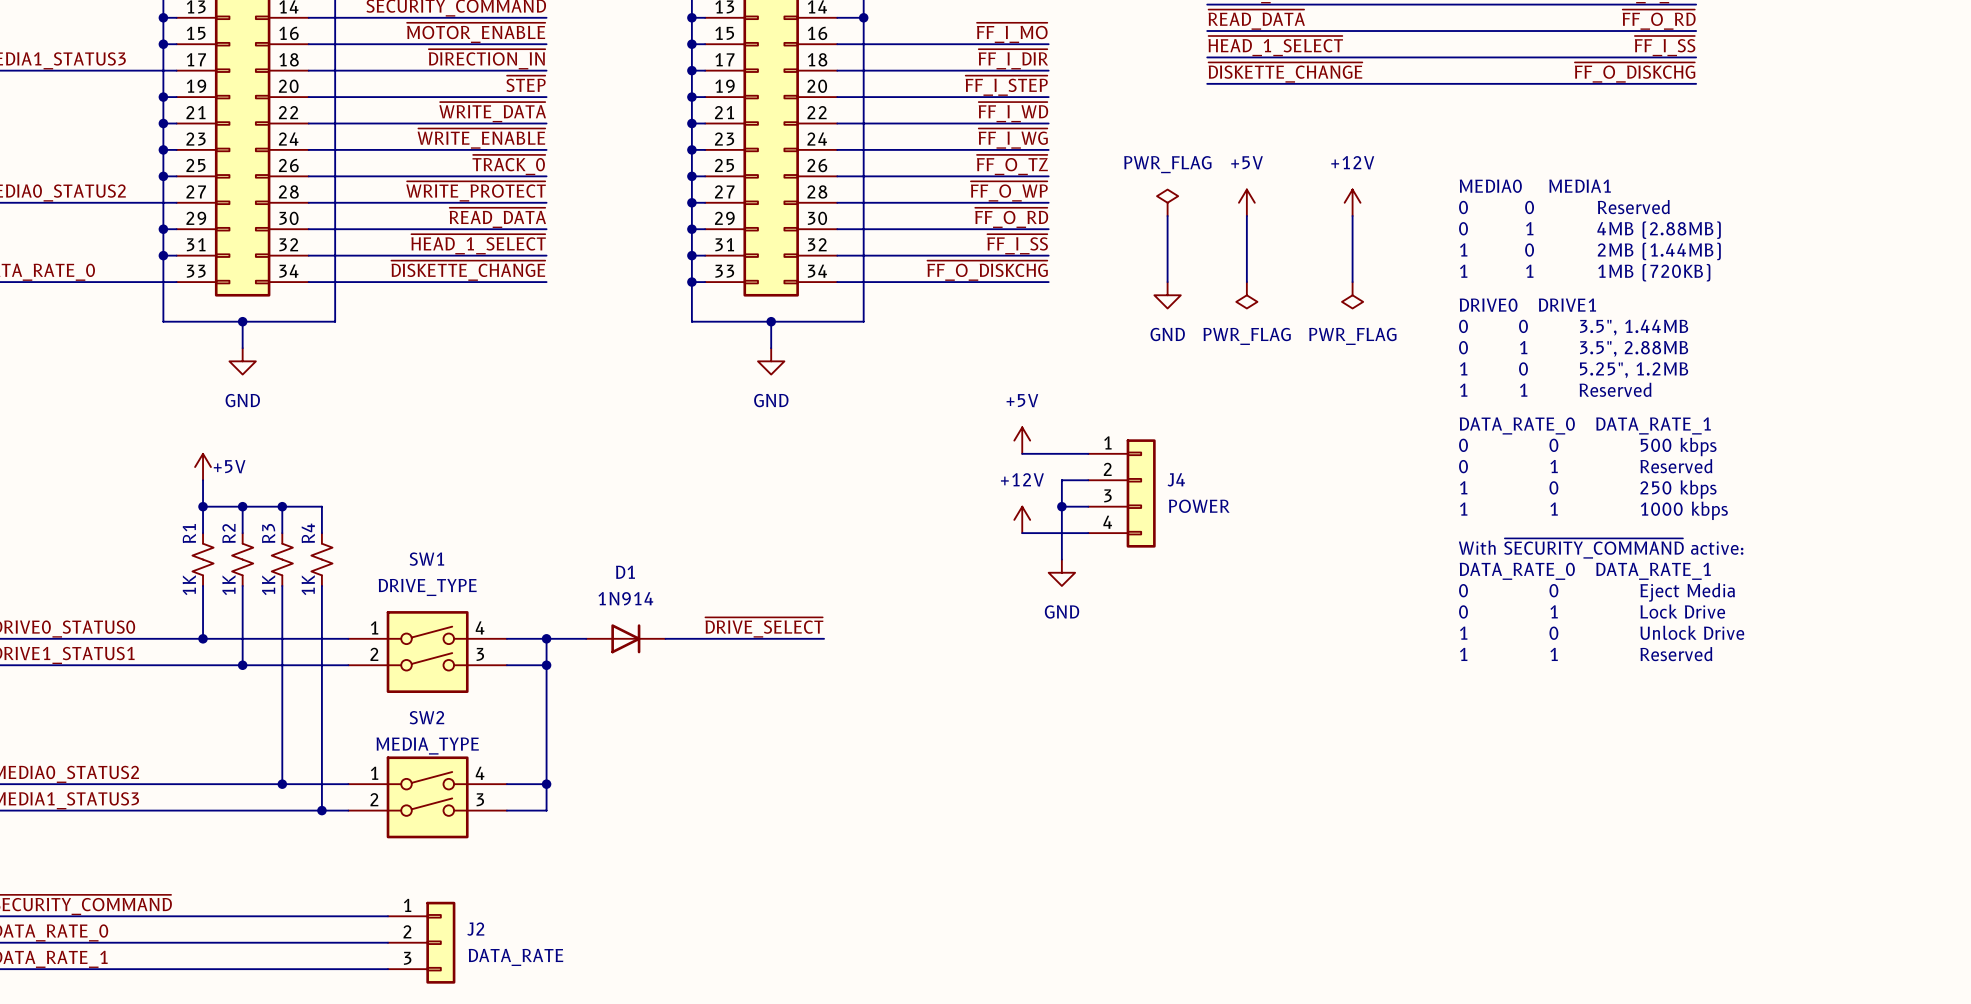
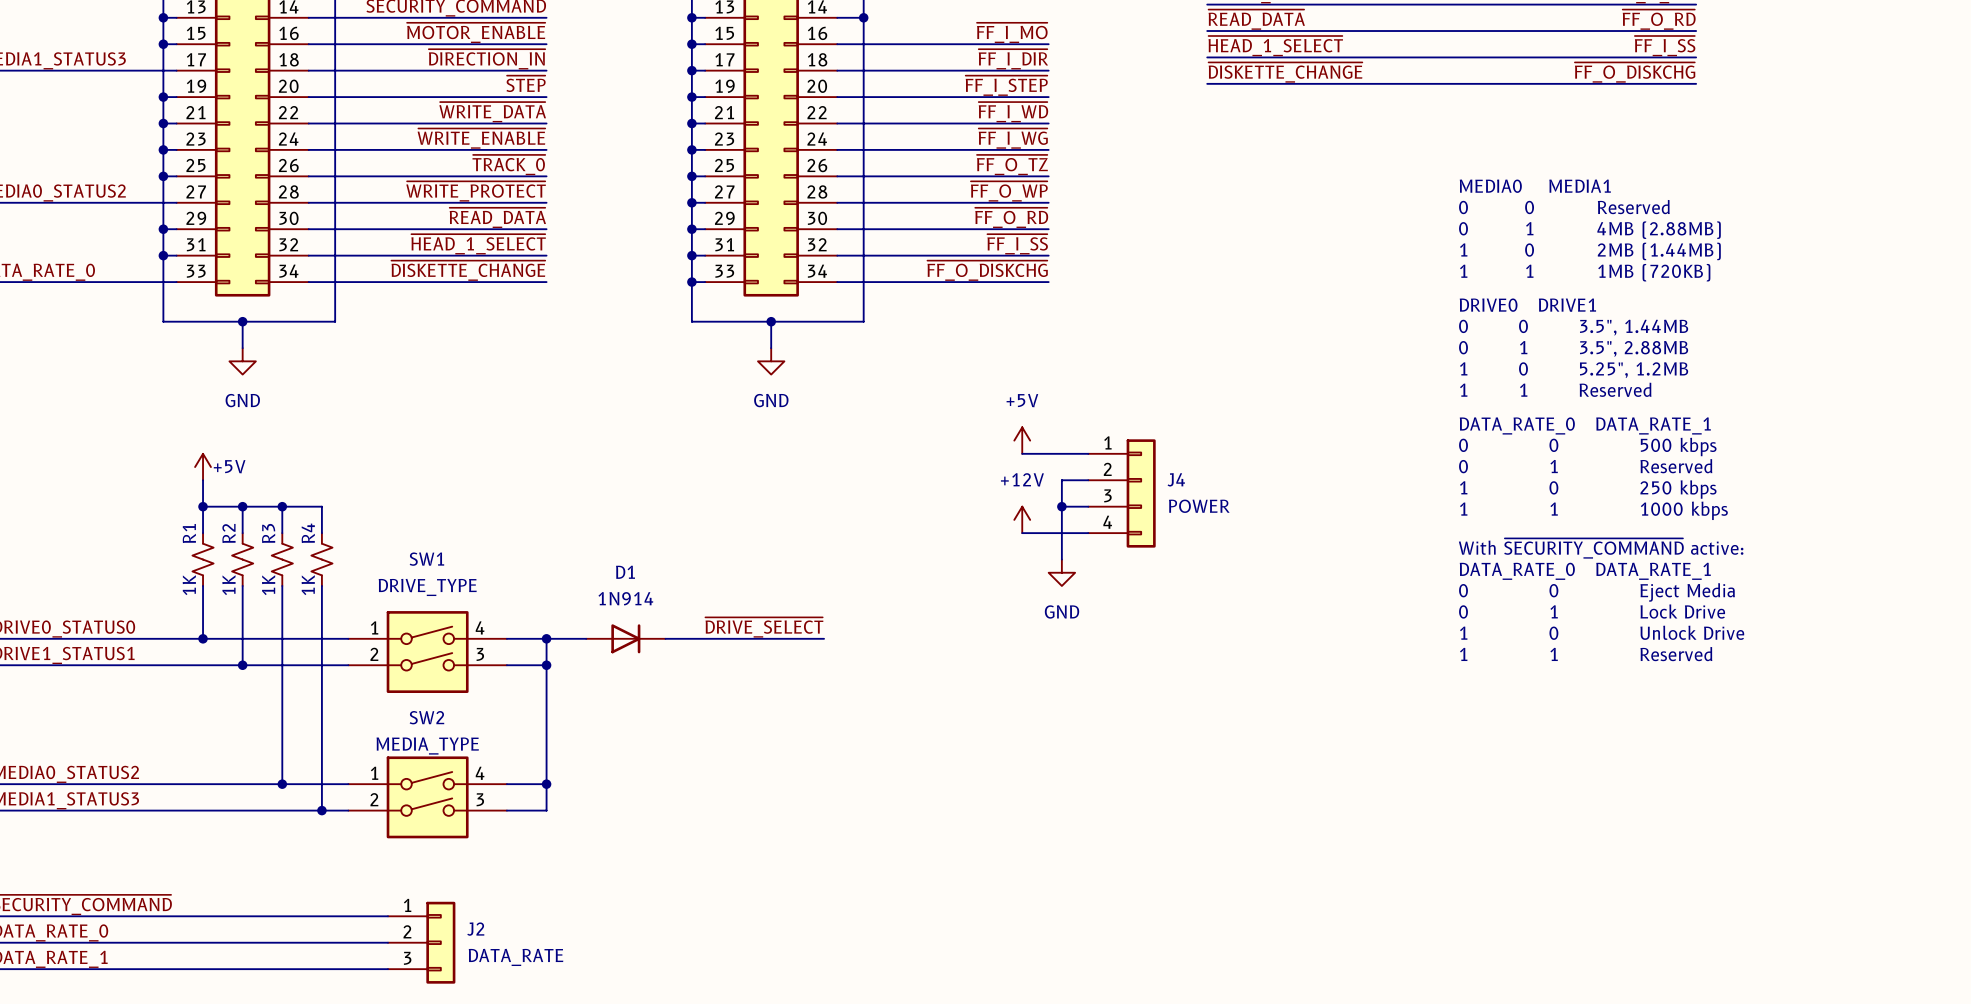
power symbol: PWR_FLAG (1167, 202) -> none
power symbol: +5V (1246, 202) -> none
power symbol: +12V (1352, 202) -> none
wire: (1167, 215) (1167, 282) -> none
wire: (1246, 215) (1246, 282) -> none
wire: (1352, 215) (1352, 282) -> none
power symbol: GND (1167, 295) -> none
power symbol: PWR_FLAG (1246, 295) -> none
power symbol: PWR_FLAG (1352, 295) -> none

